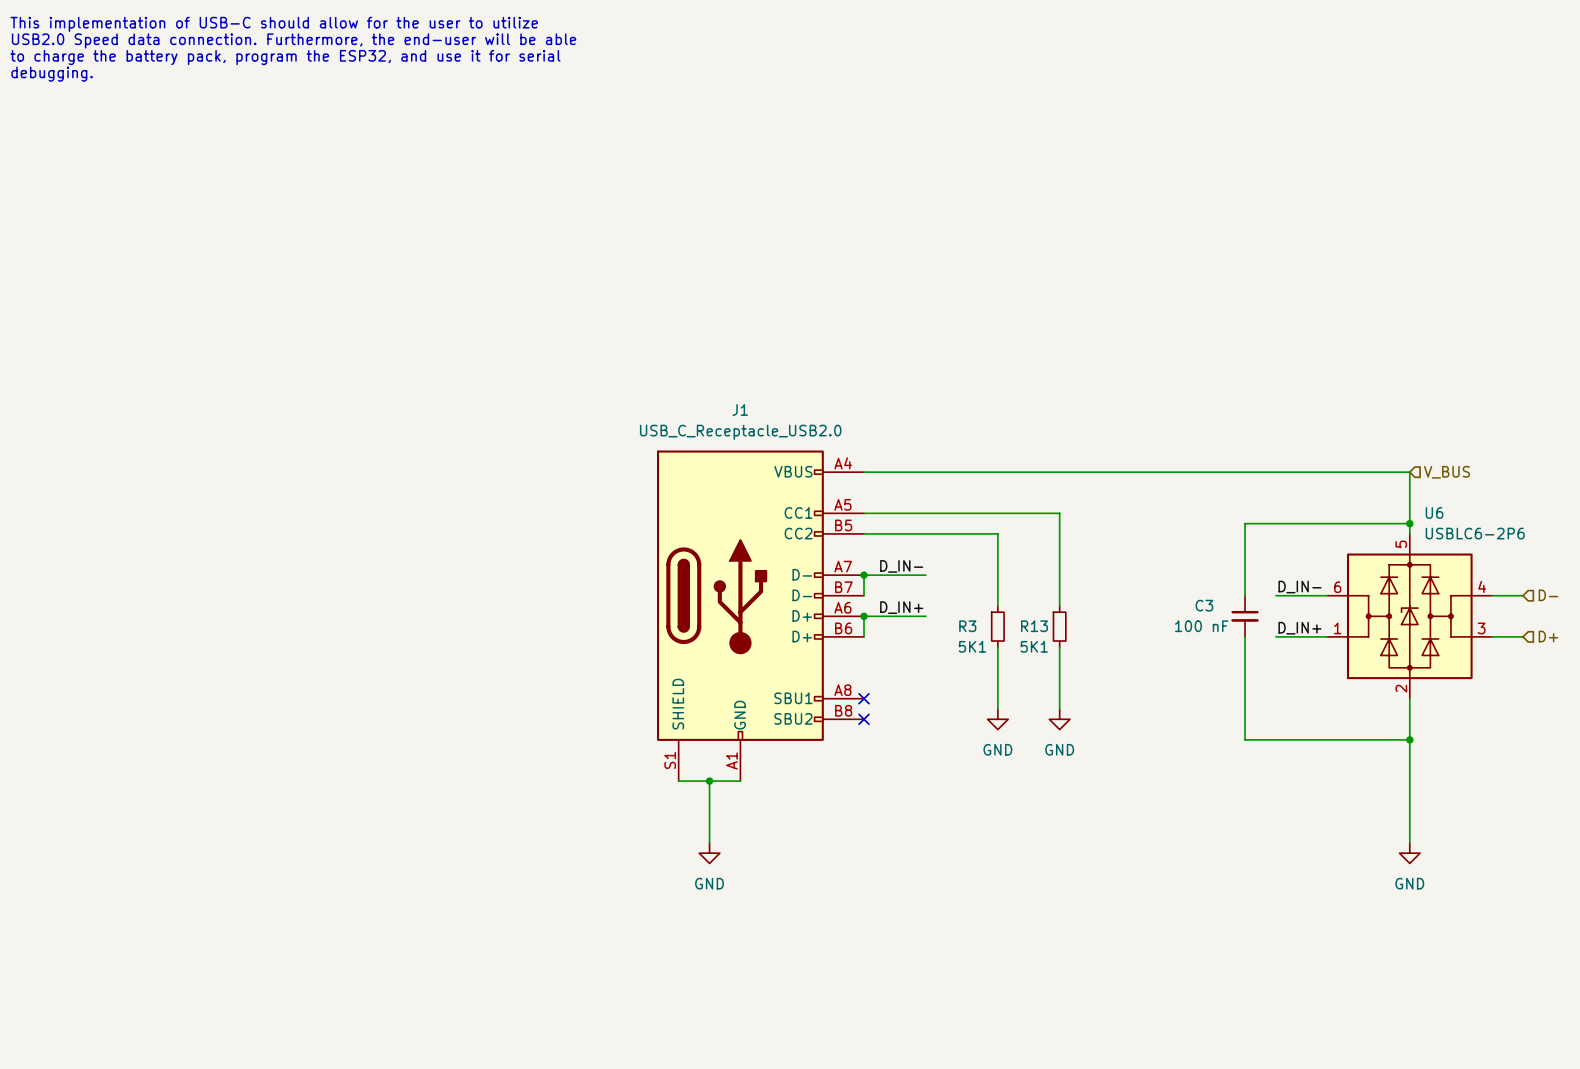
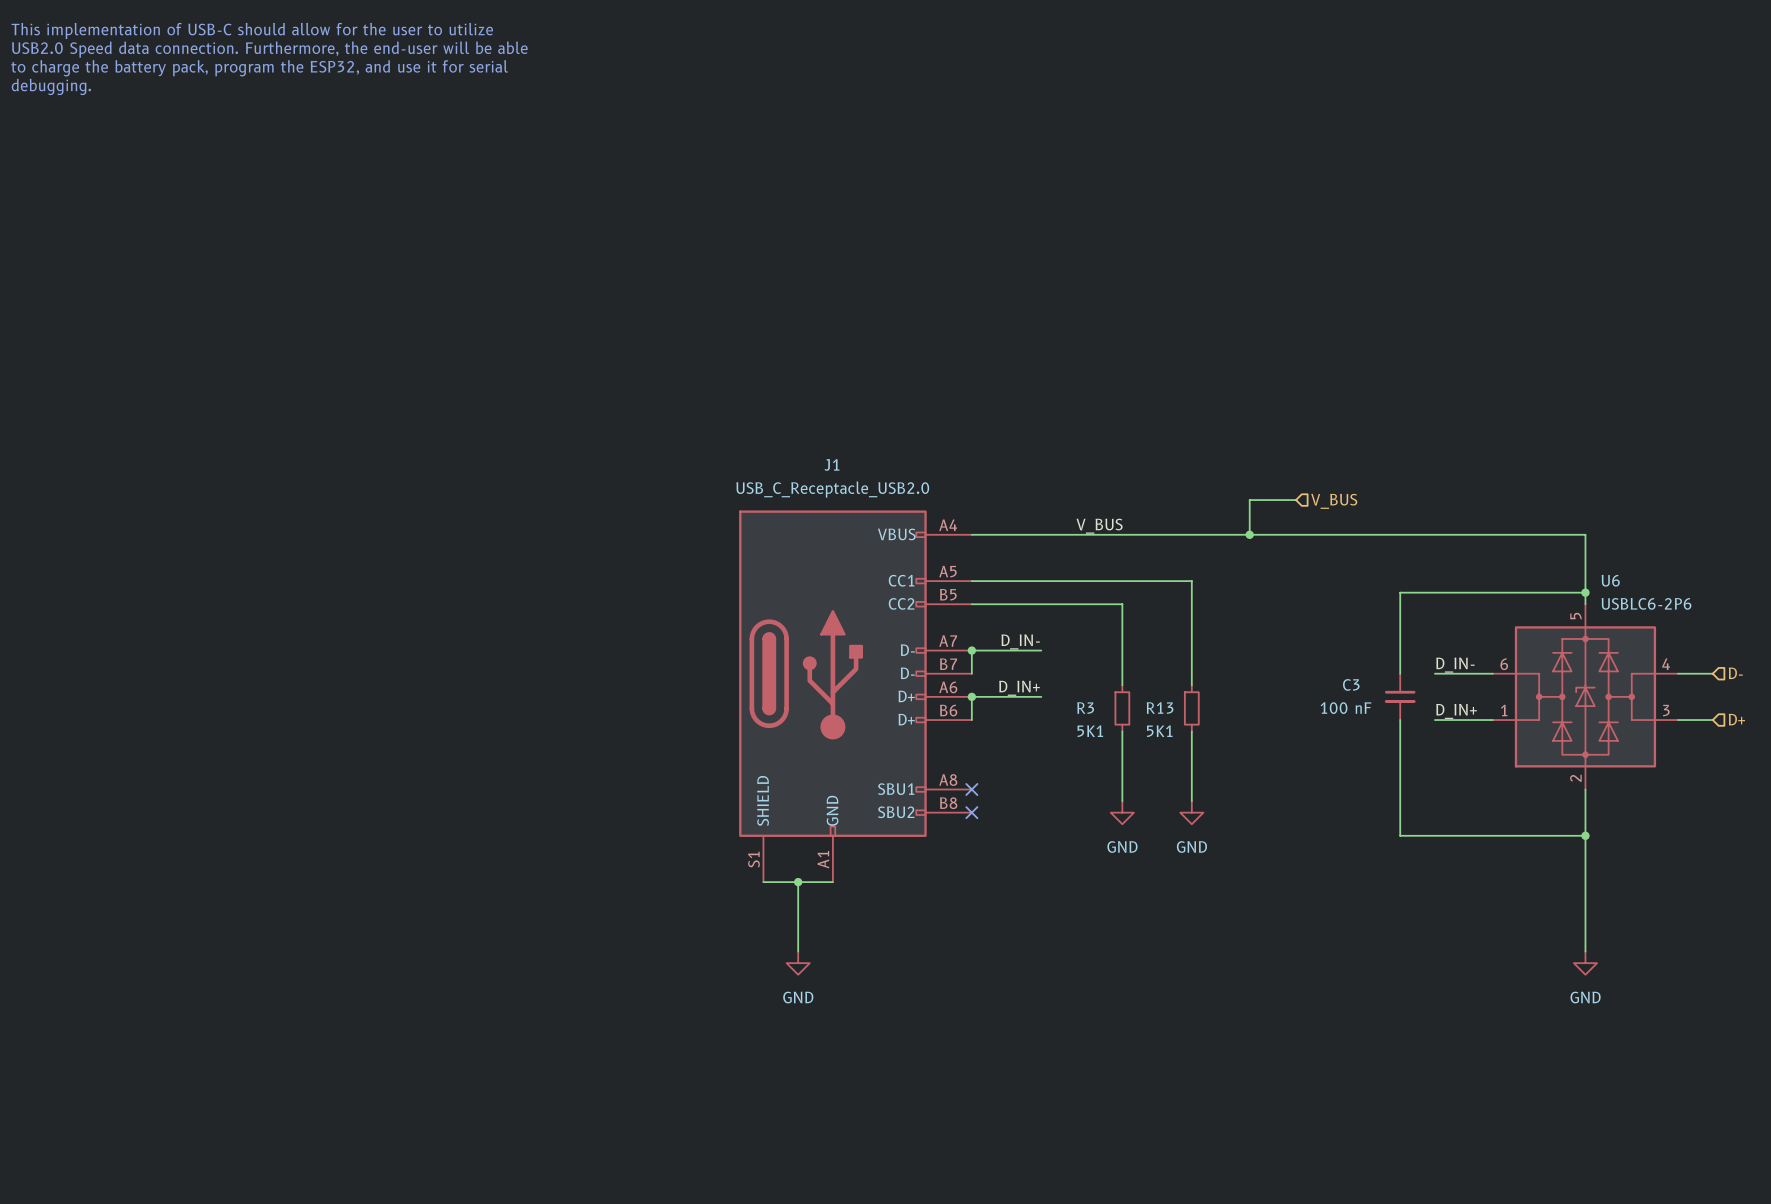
wire: none -> (1296, 500) (1249, 500) (1249, 534)
hierarchical label: none -> V_BUS (1334, 501)
label: none -> V_BUS (1099, 526)
junction: none -> (1249, 534)
hierarchical label: V_BUS (1446, 472) -> none

